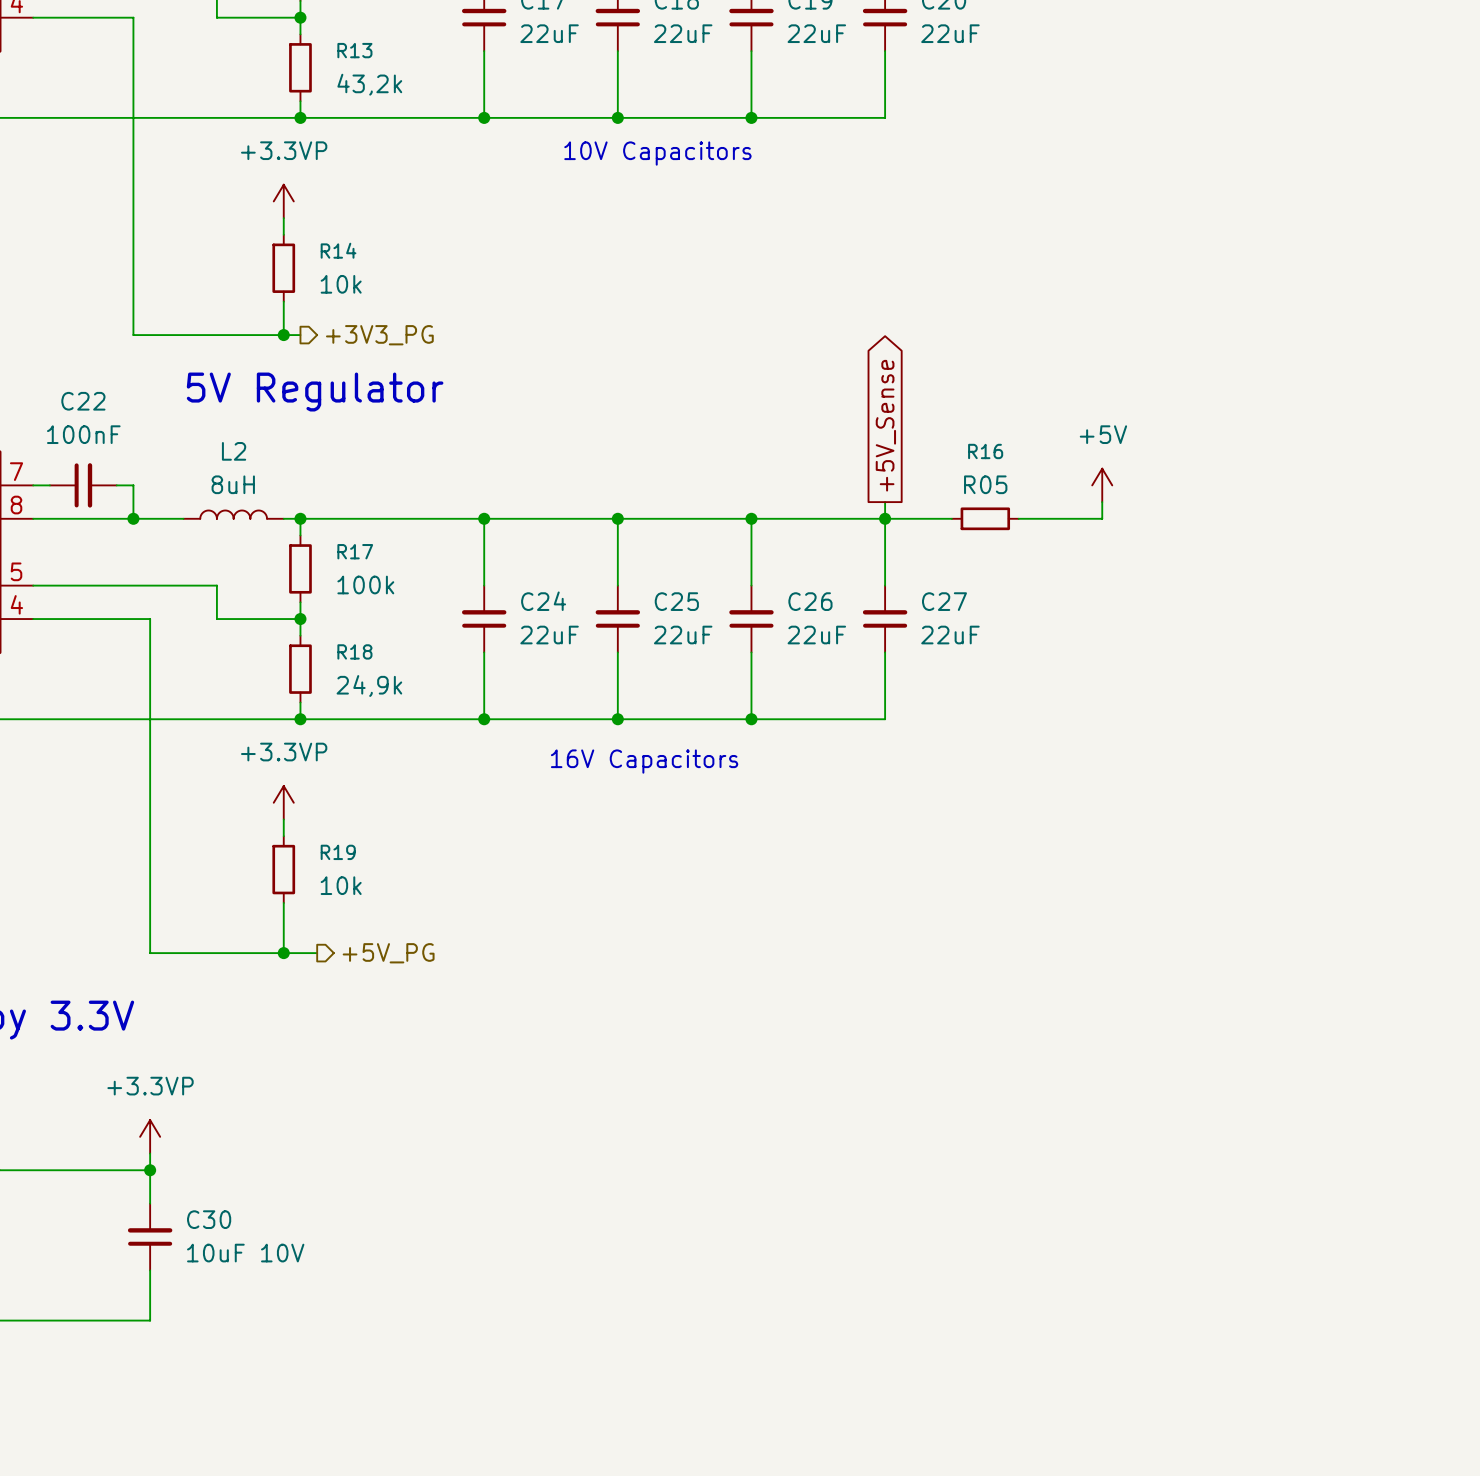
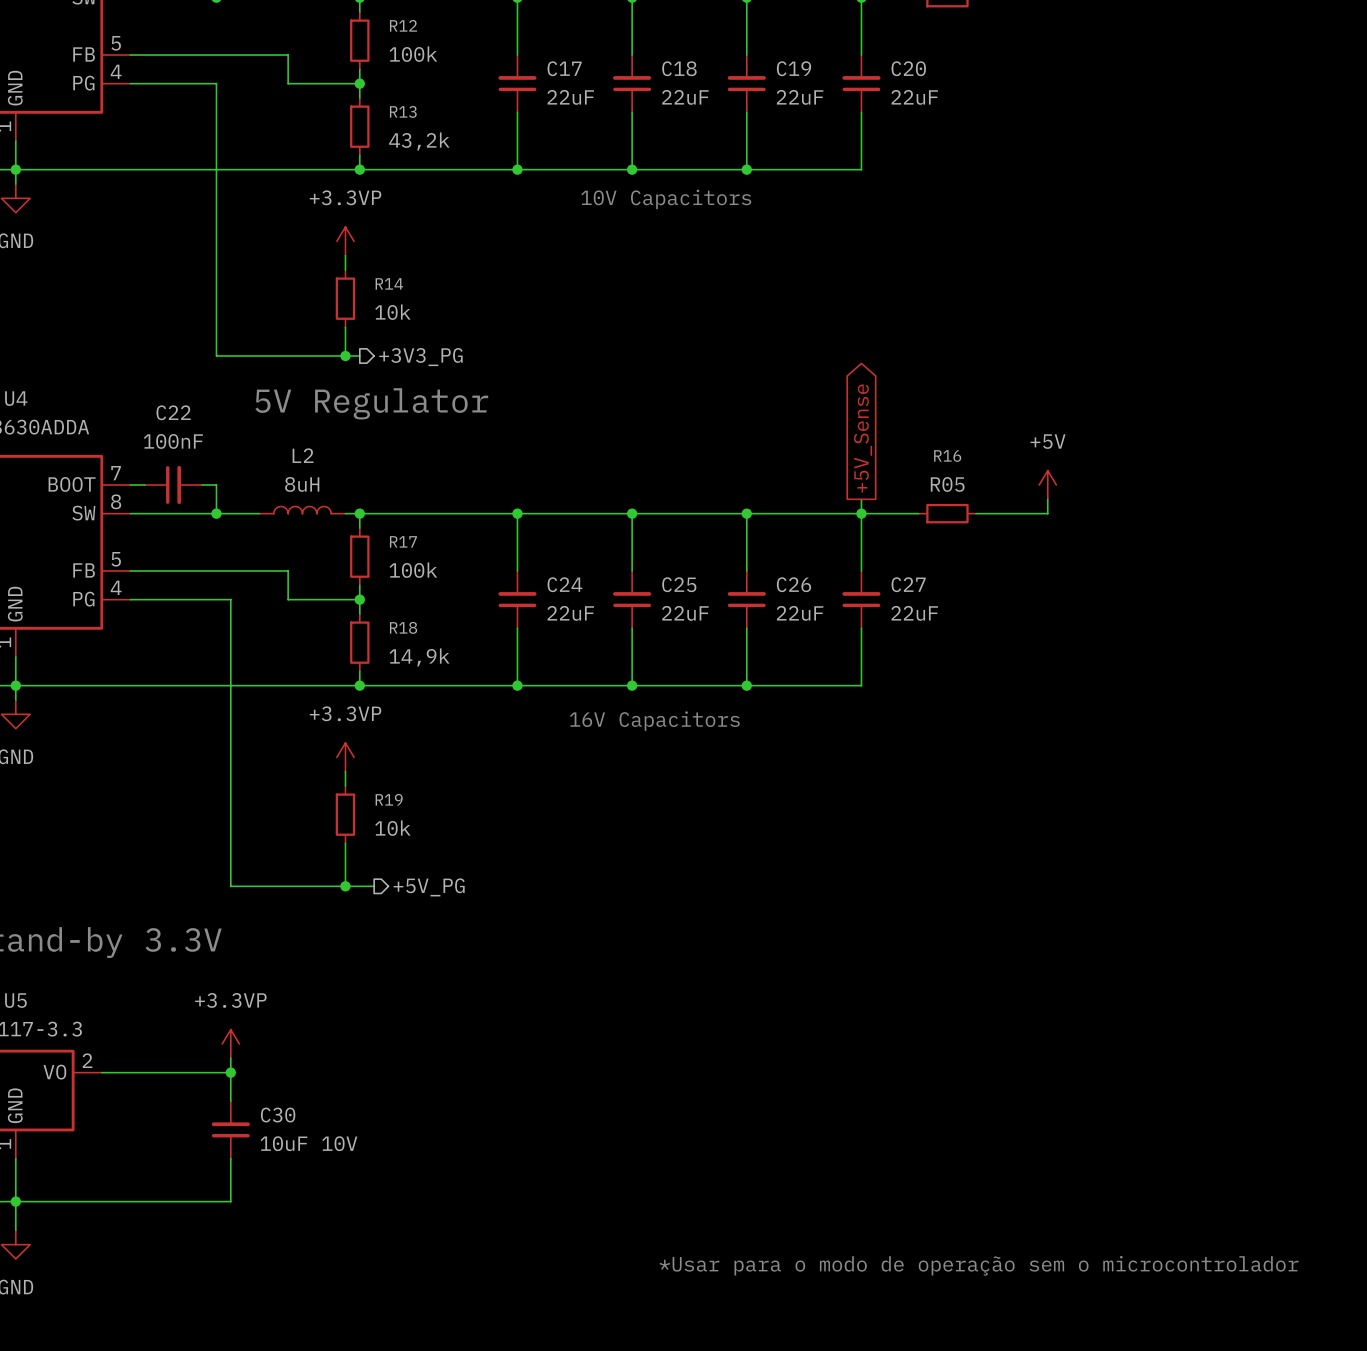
R18 value: 24,9k (369, 686) -> 14,9k (419, 657)
text: none -> *Usar para o modo de operação sem o microcontrolador (979, 1265)

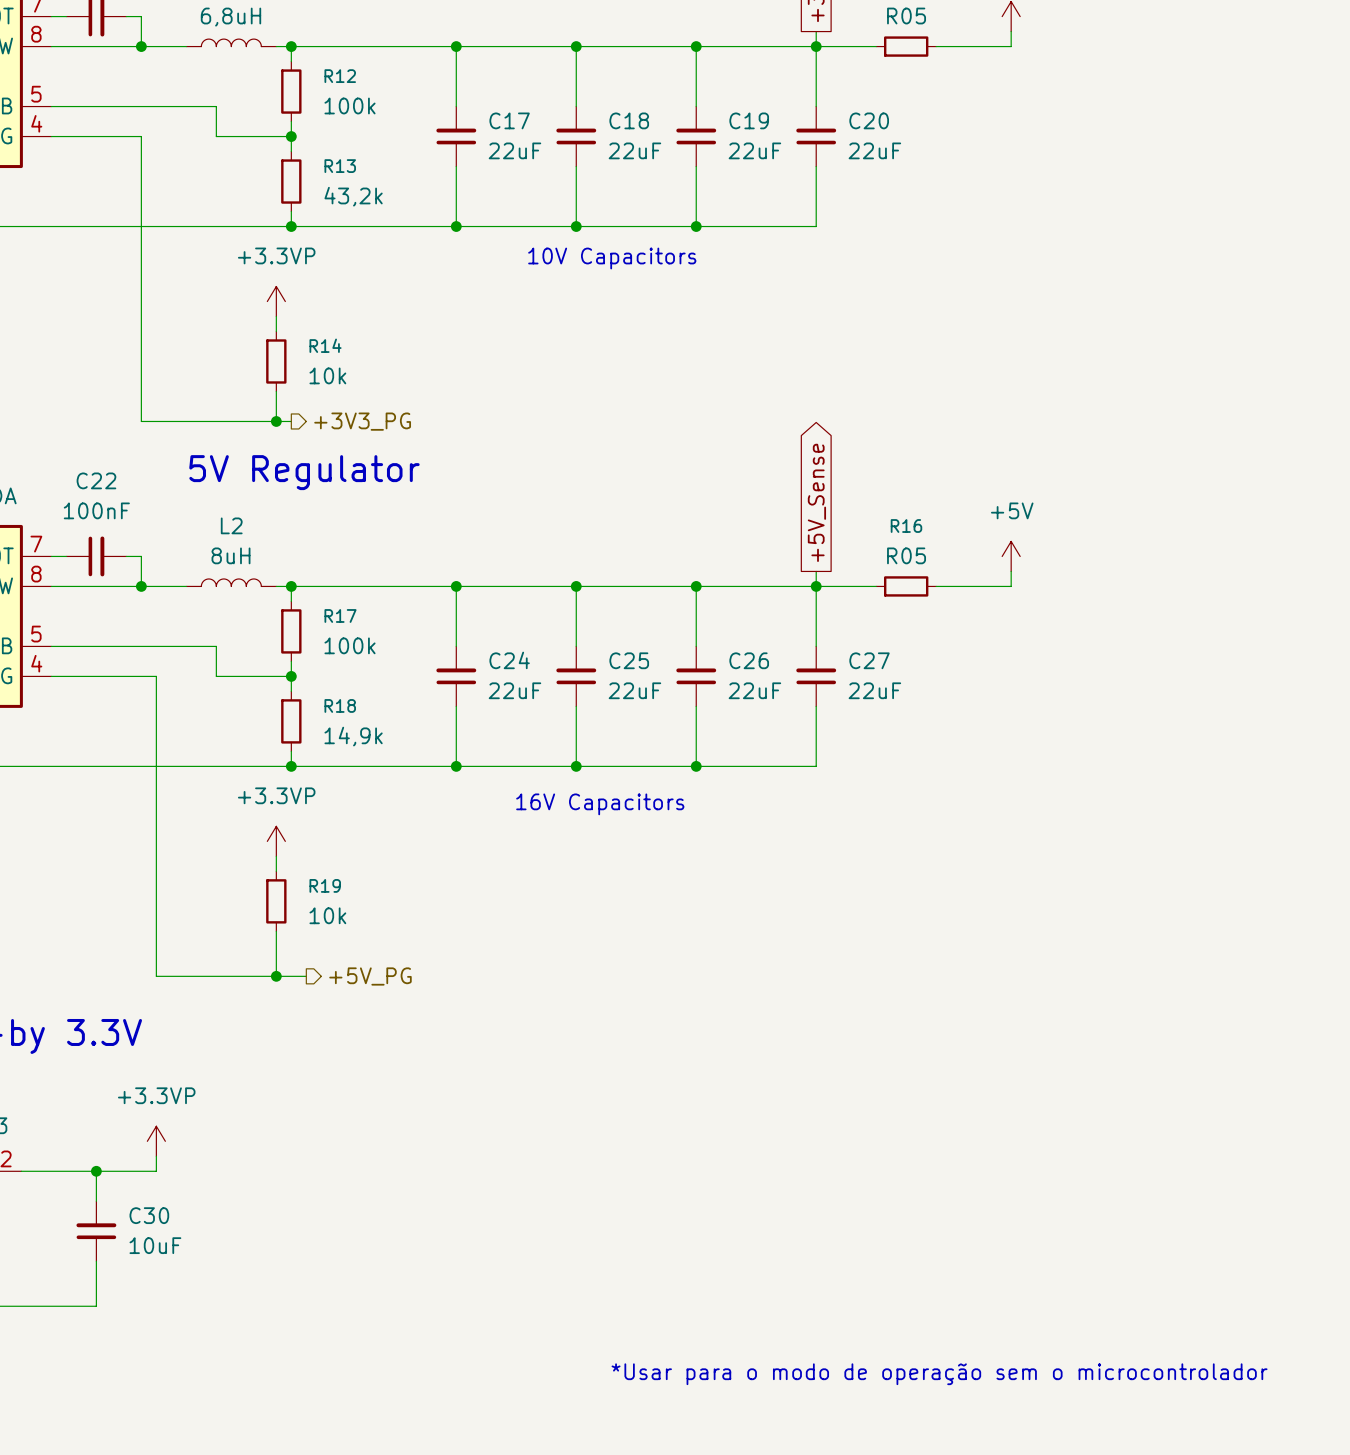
wire: (230, 1072) (230, 1101) -> (96, 1171) (96, 1201)
junction position: (230, 1072) -> (96, 1171)
C30 position: (230, 1129) -> (96, 1231)
C30 value: 10uF 10V (308, 1143) -> 10uF (155, 1245)
wire: (230, 1158) (230, 1201) (173, 1201) -> (96, 1261) (96, 1306)

